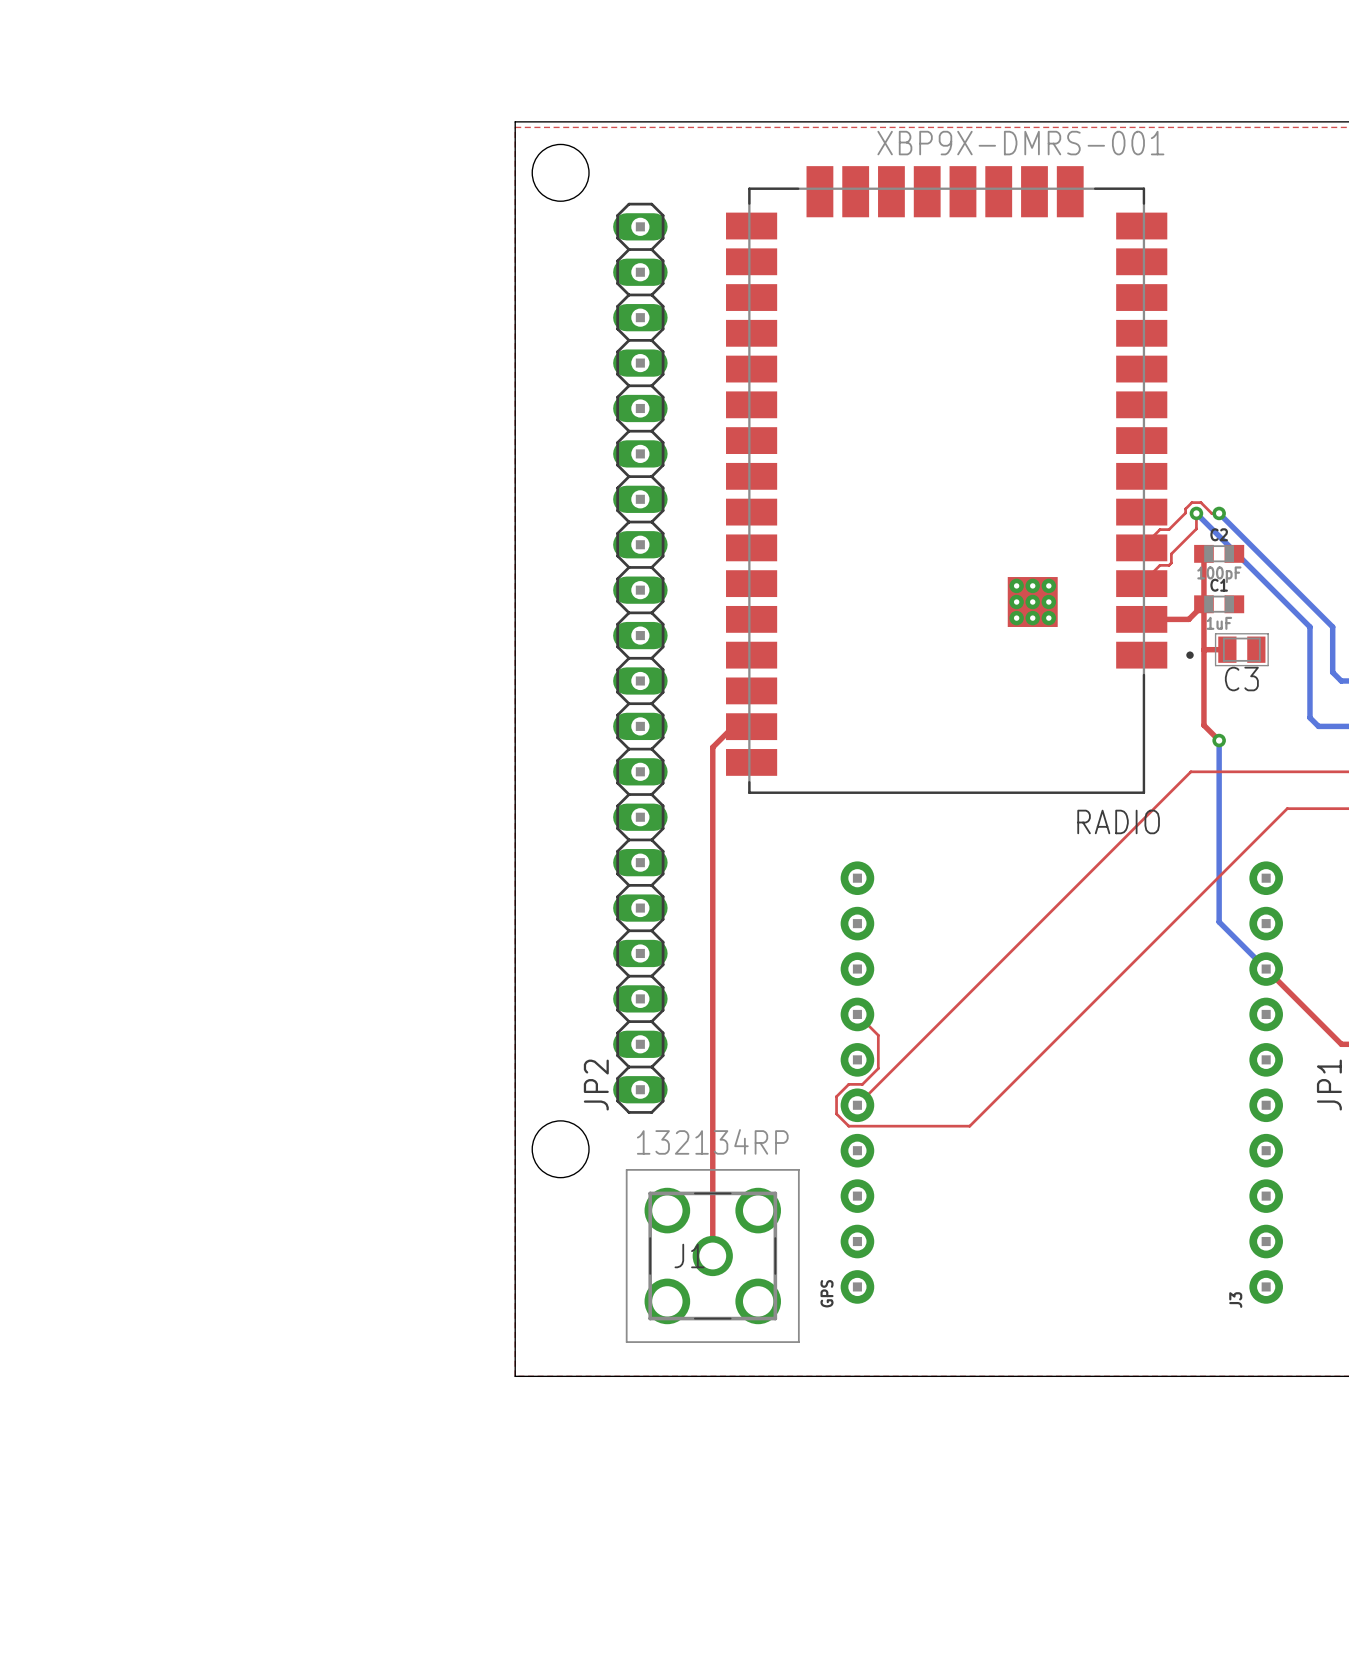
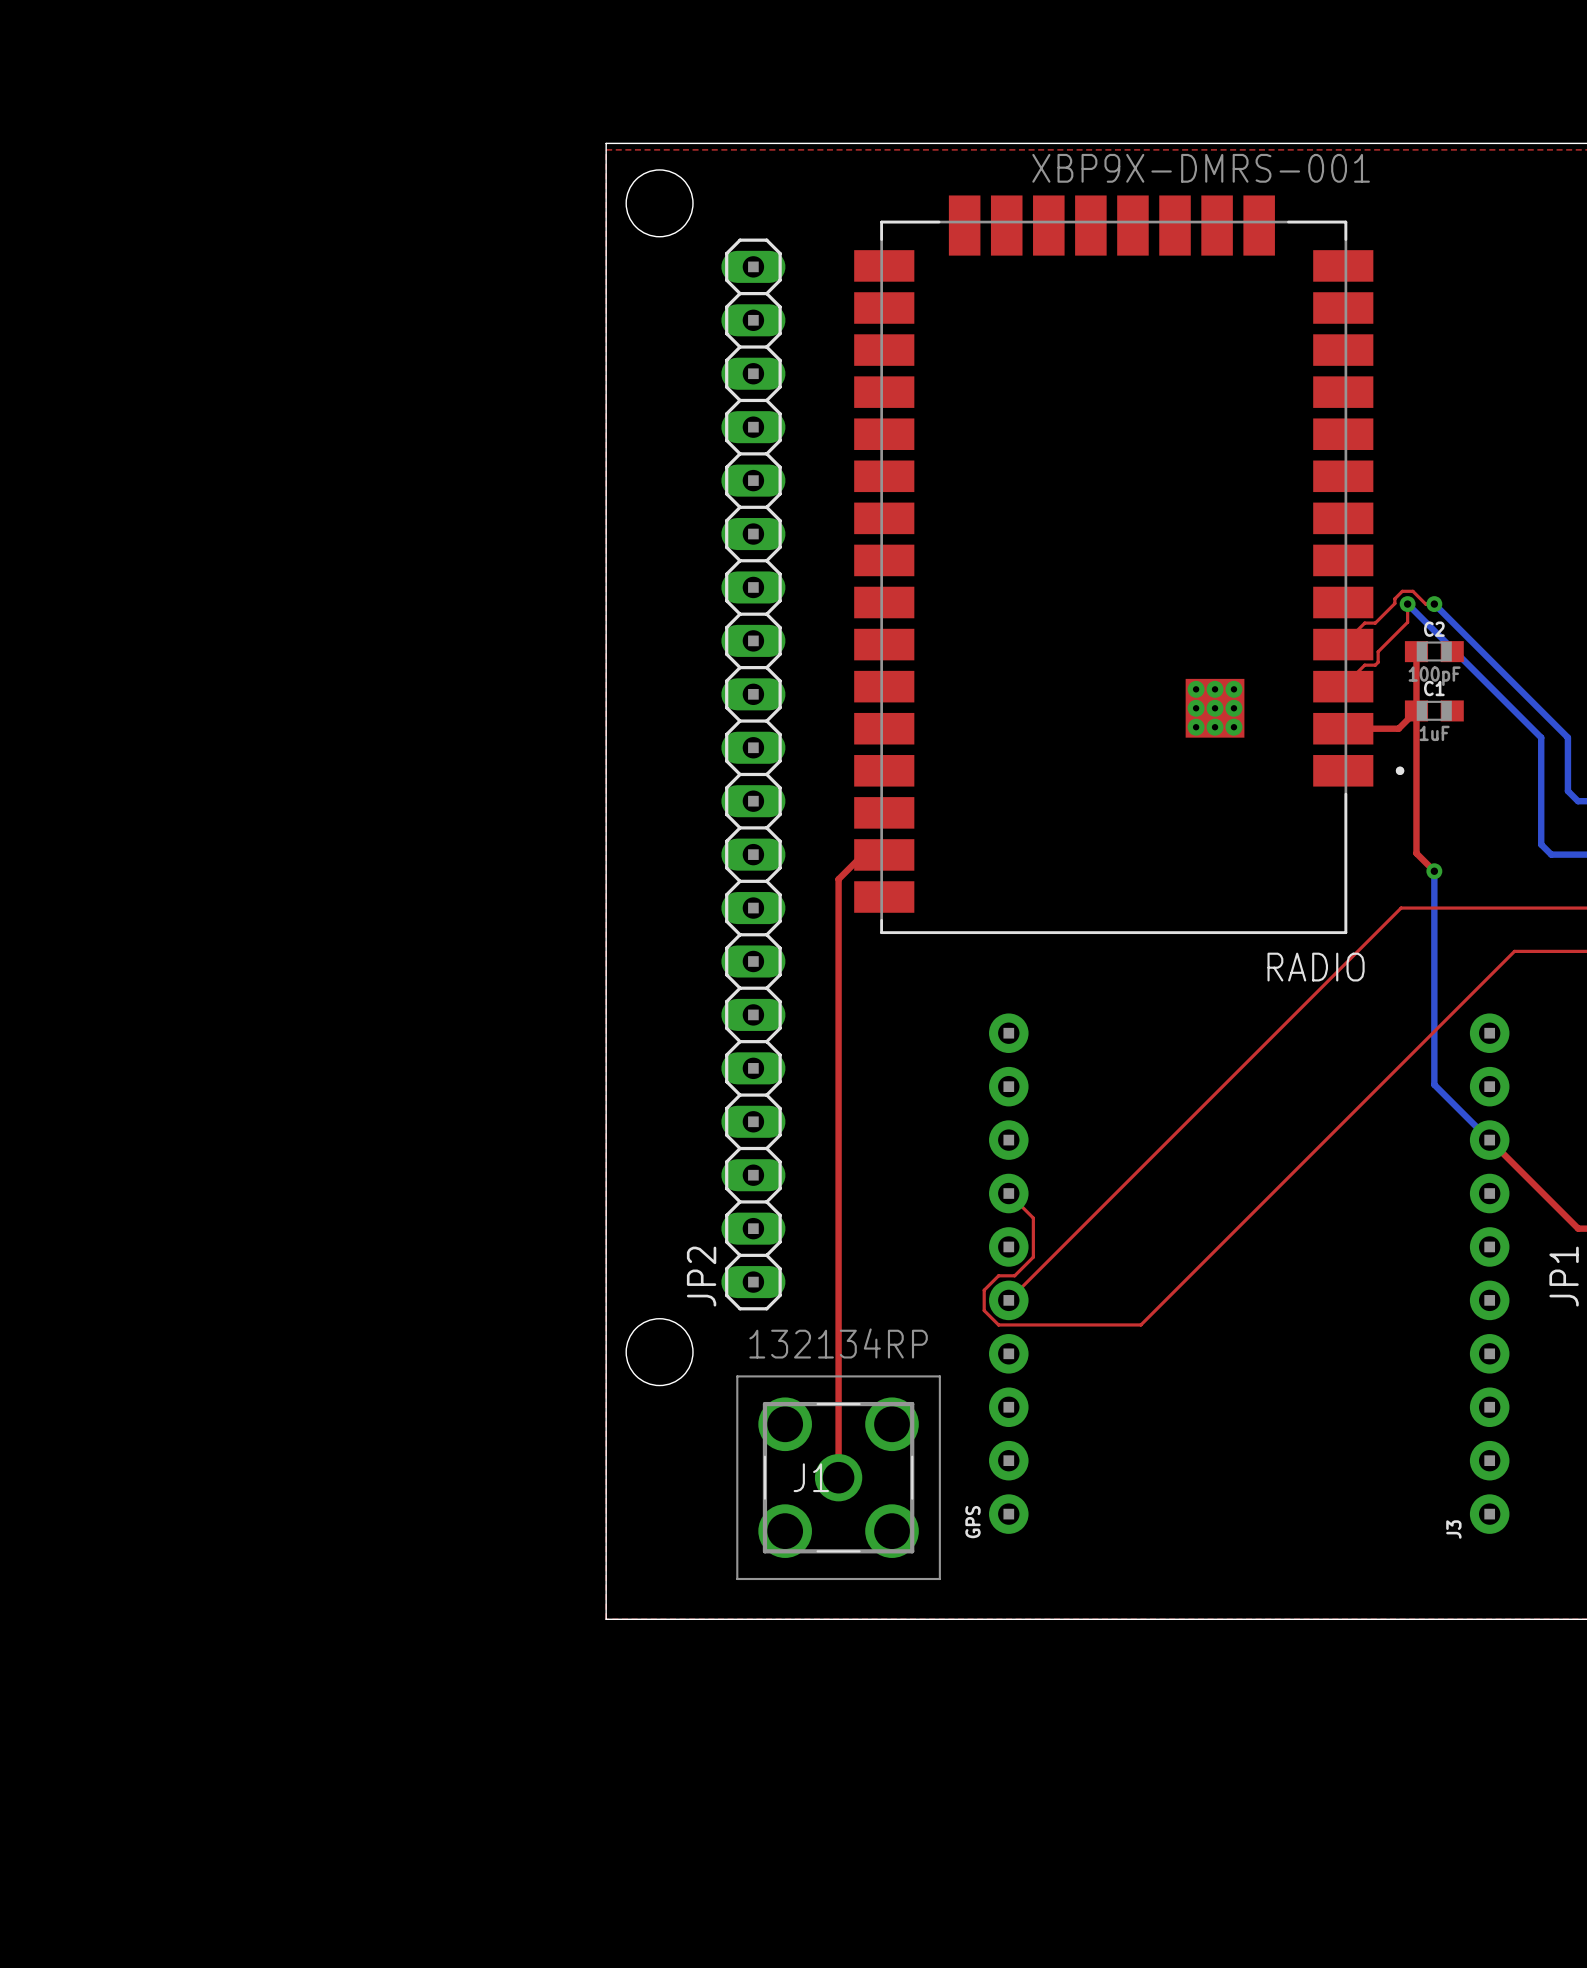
top track: (1203, 649) (1227, 649) -> none
C3: (1241, 649) -> none

